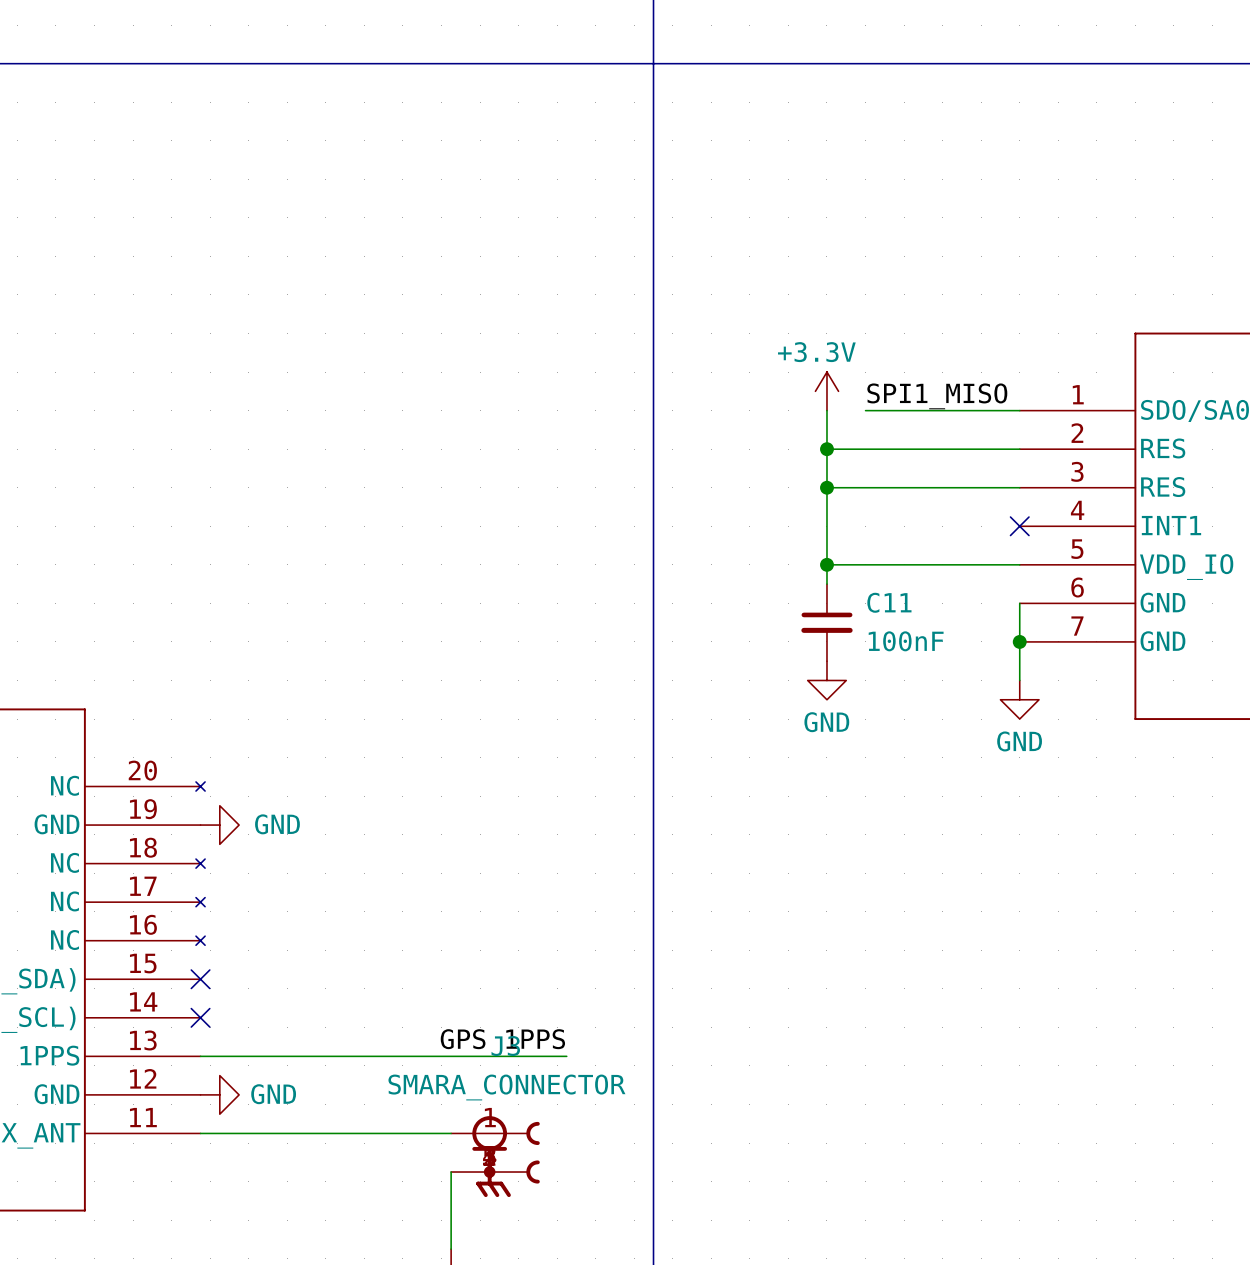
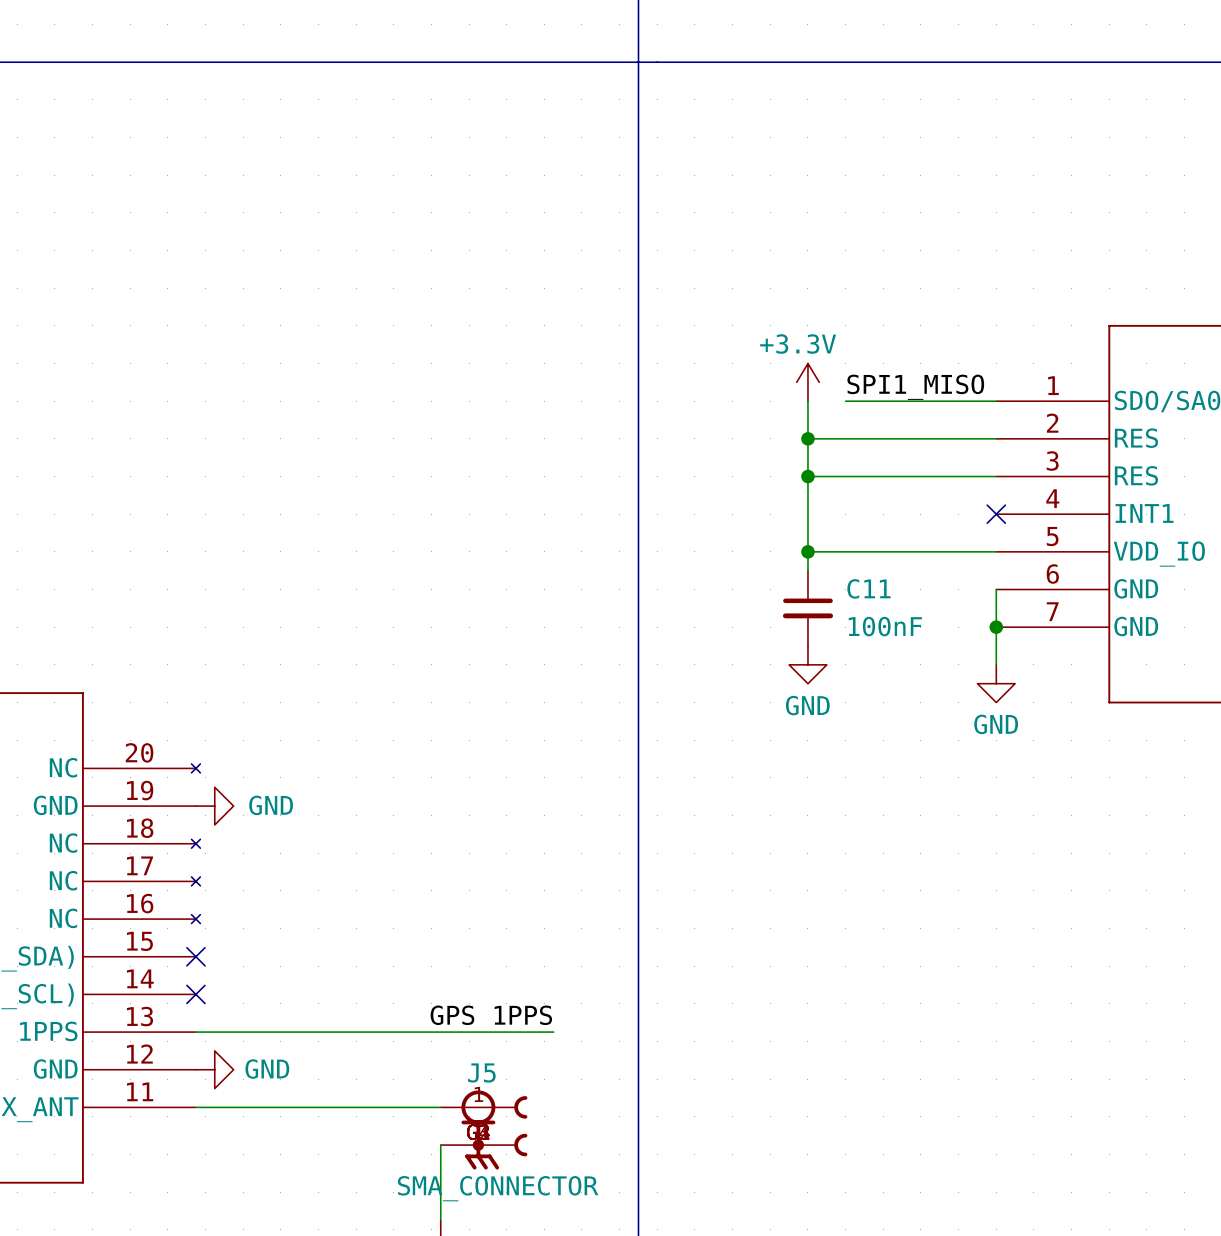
J3 name: J3 (505, 1046) -> J5 (481, 1072)
J3 value: SMARA_CONNECTOR (506, 1087) -> SMA_CONNECTOR (498, 1188)
J3 symbol: [451, 1116, 540, 1198] -> [440, 1090, 528, 1170]

